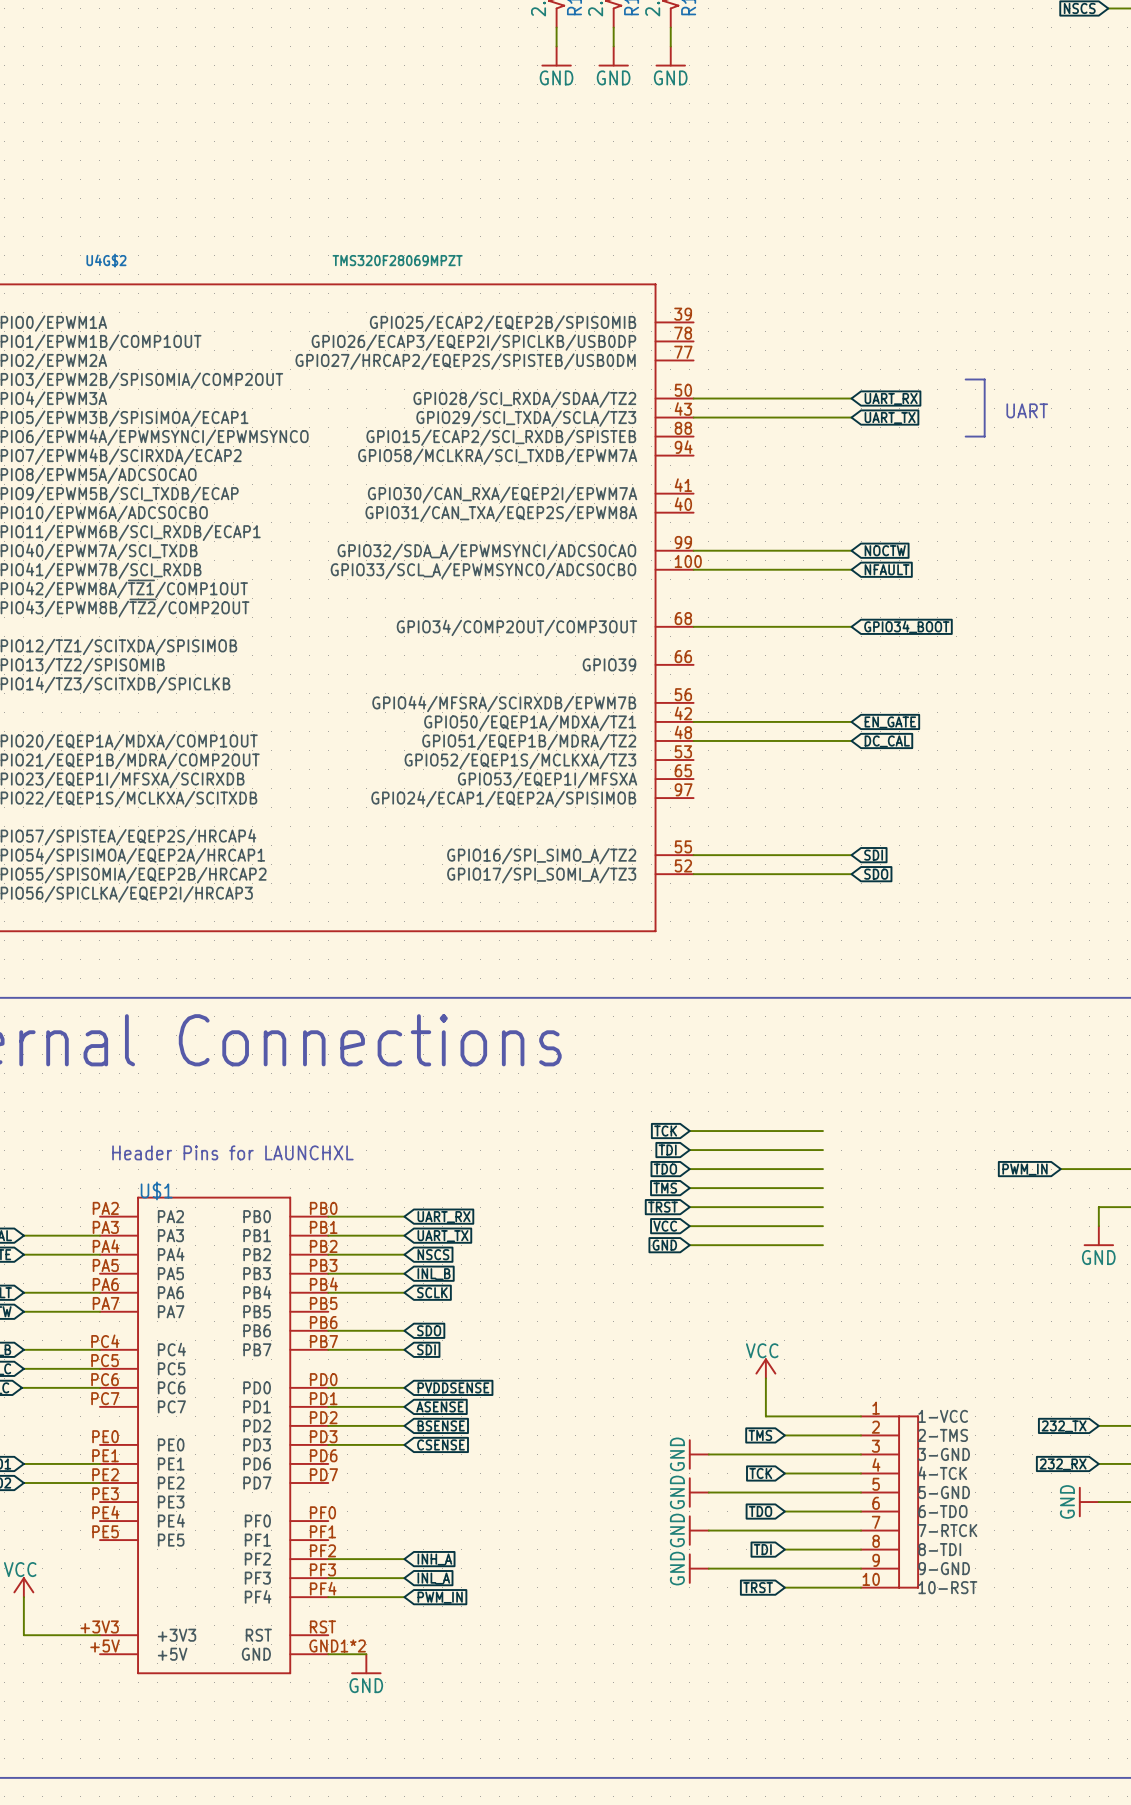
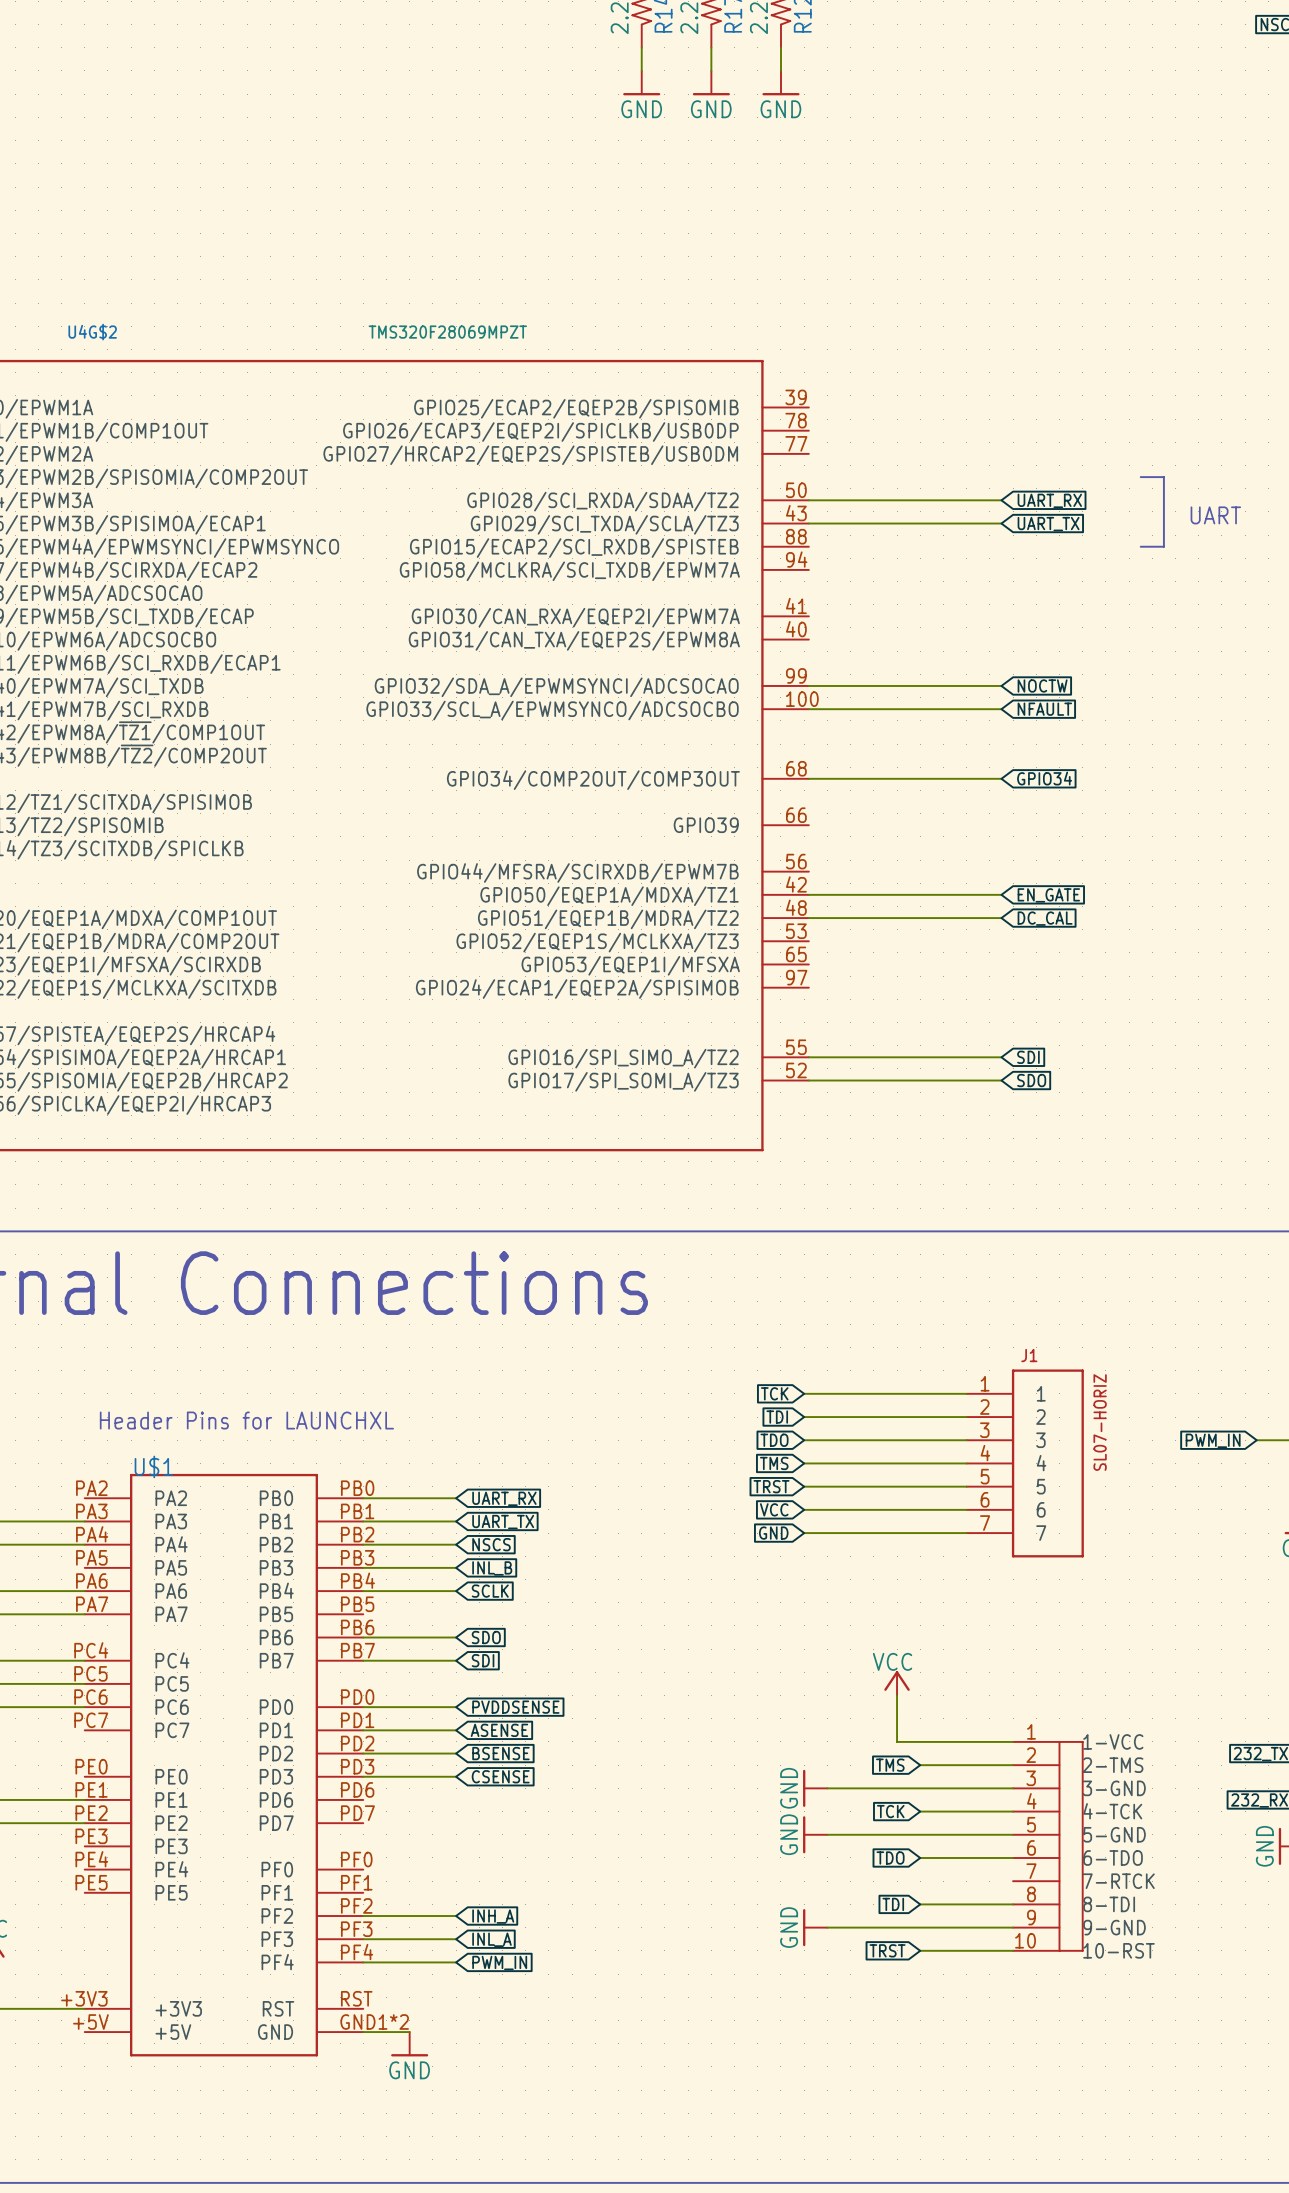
global label: GPIO34_BOOT (906, 627) -> GPIO34 (1044, 778)
J1: none -> SL07-HORIZ (1025, 1463)
power symbol: GND (698, 1530) -> none
wire: (708, 1530) (861, 1530) -> none

